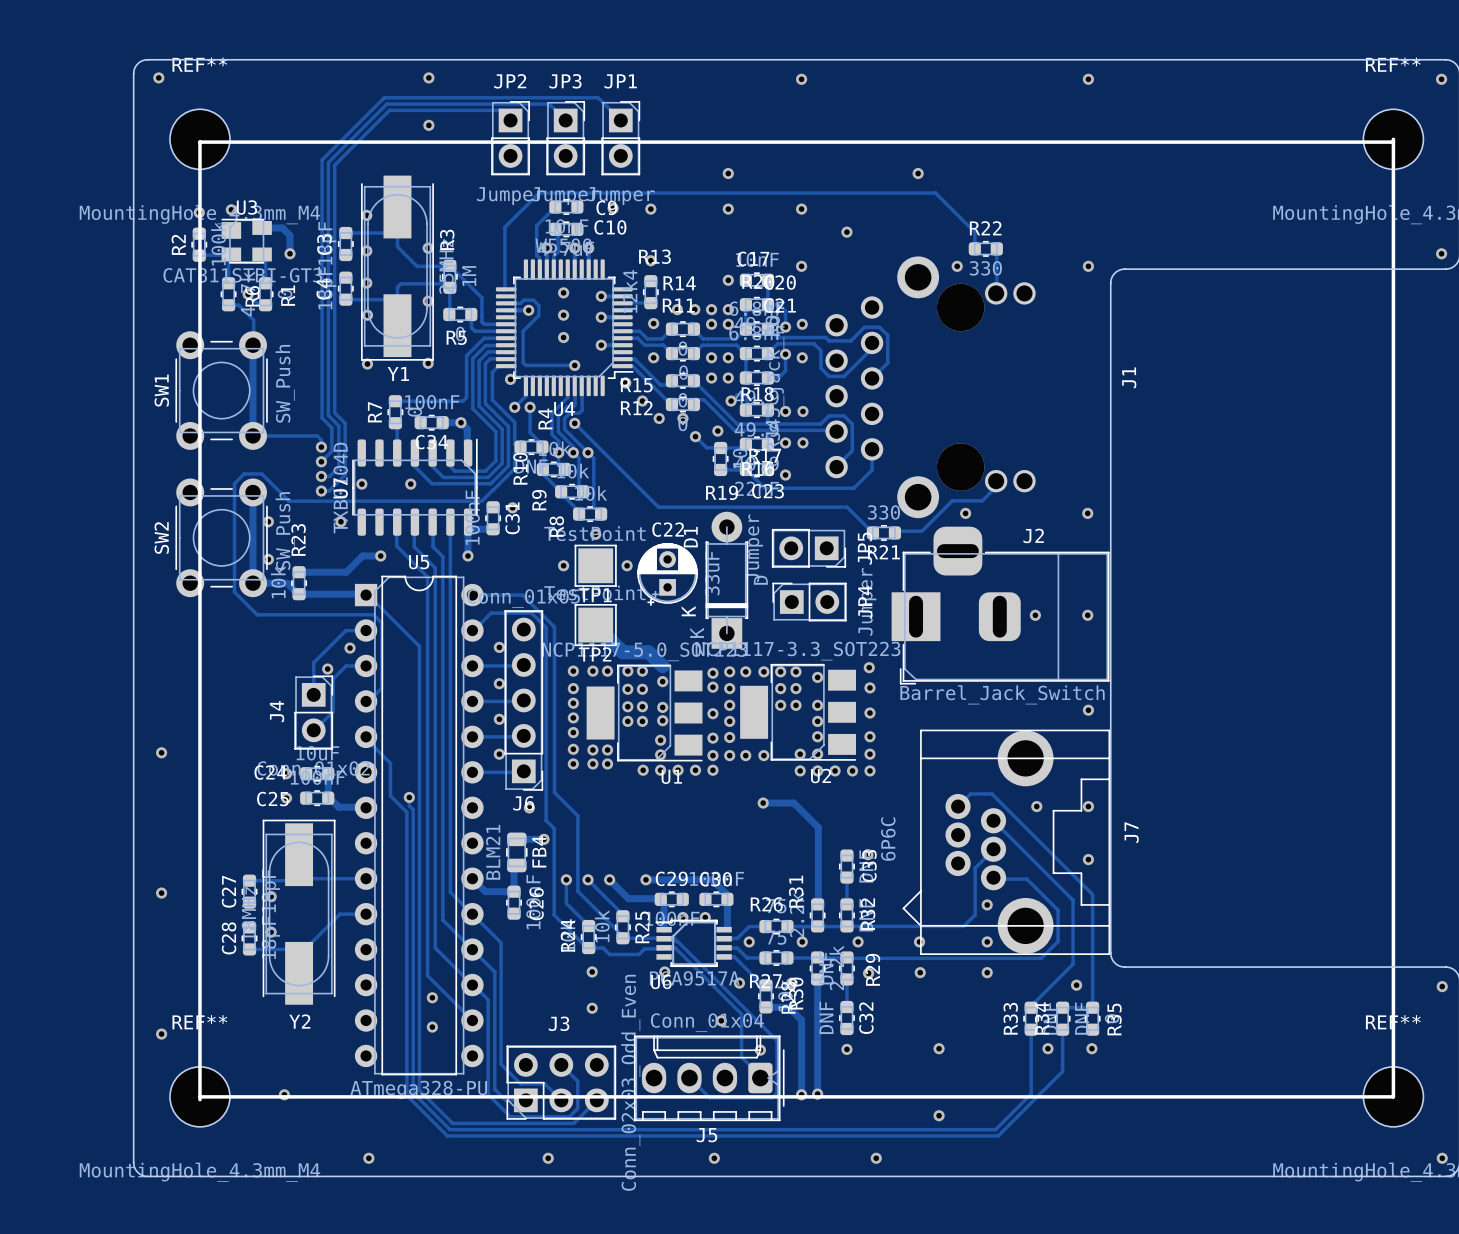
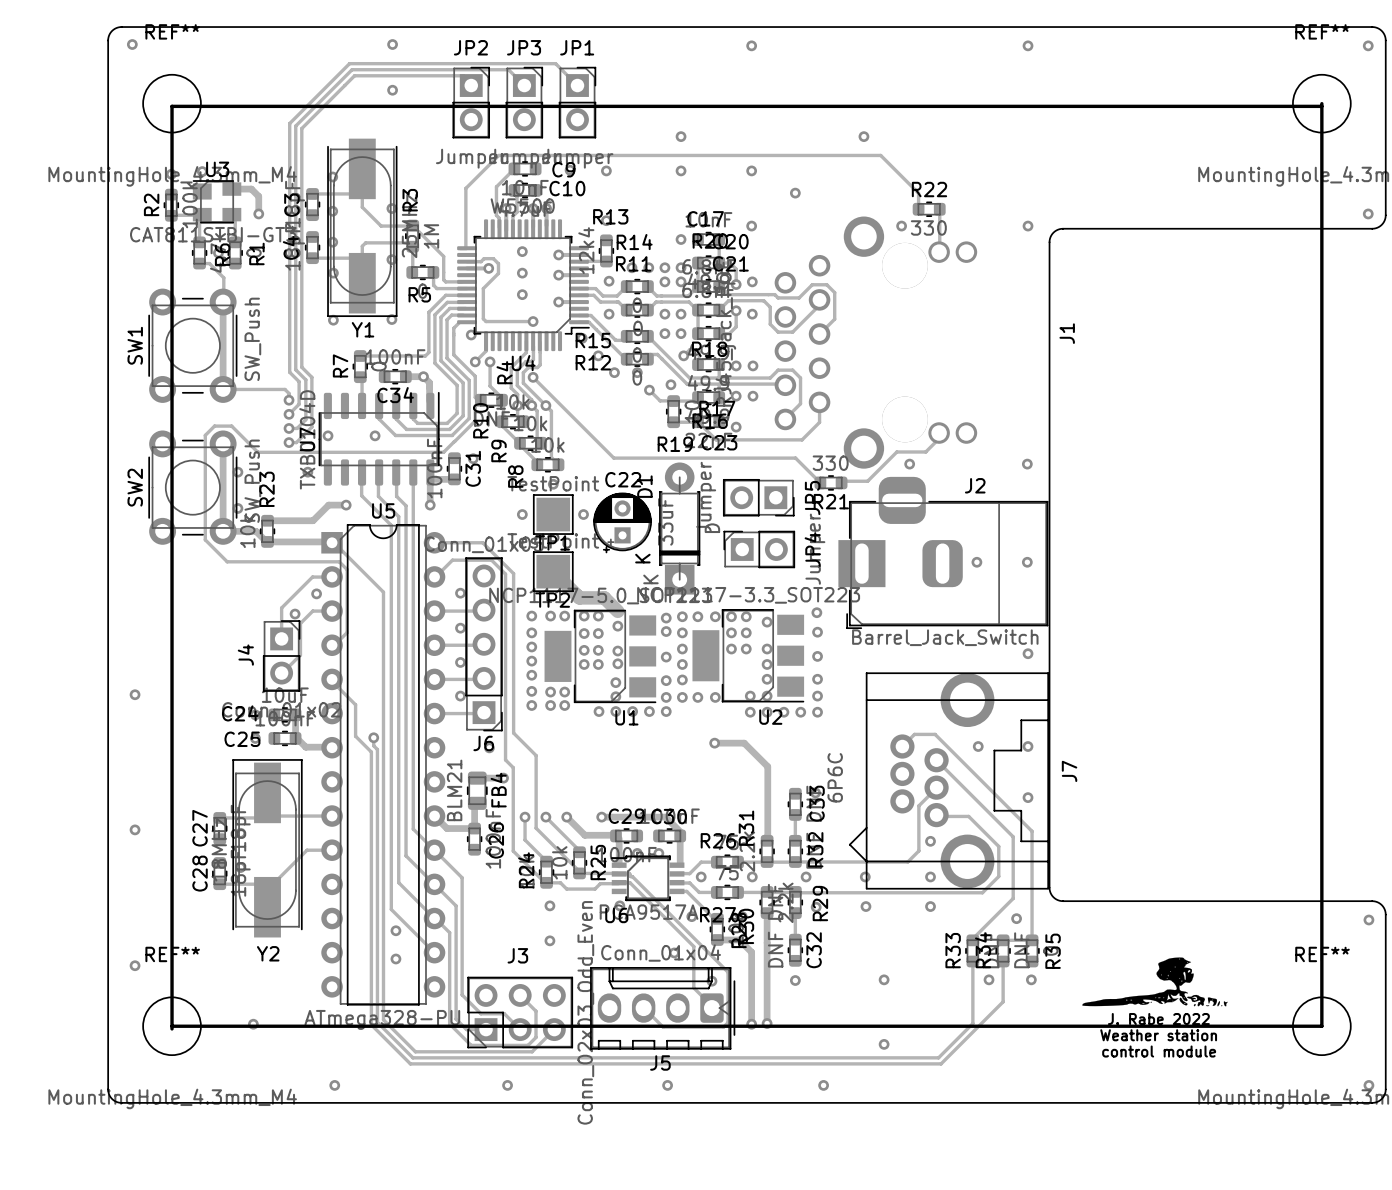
drawing: none -> [1082, 957, 1228, 1007]
text: none -> J. Rabe 2022 (1158, 1019)
text: none -> Weather station (1158, 1035)
text: none -> control module (1159, 1051)

